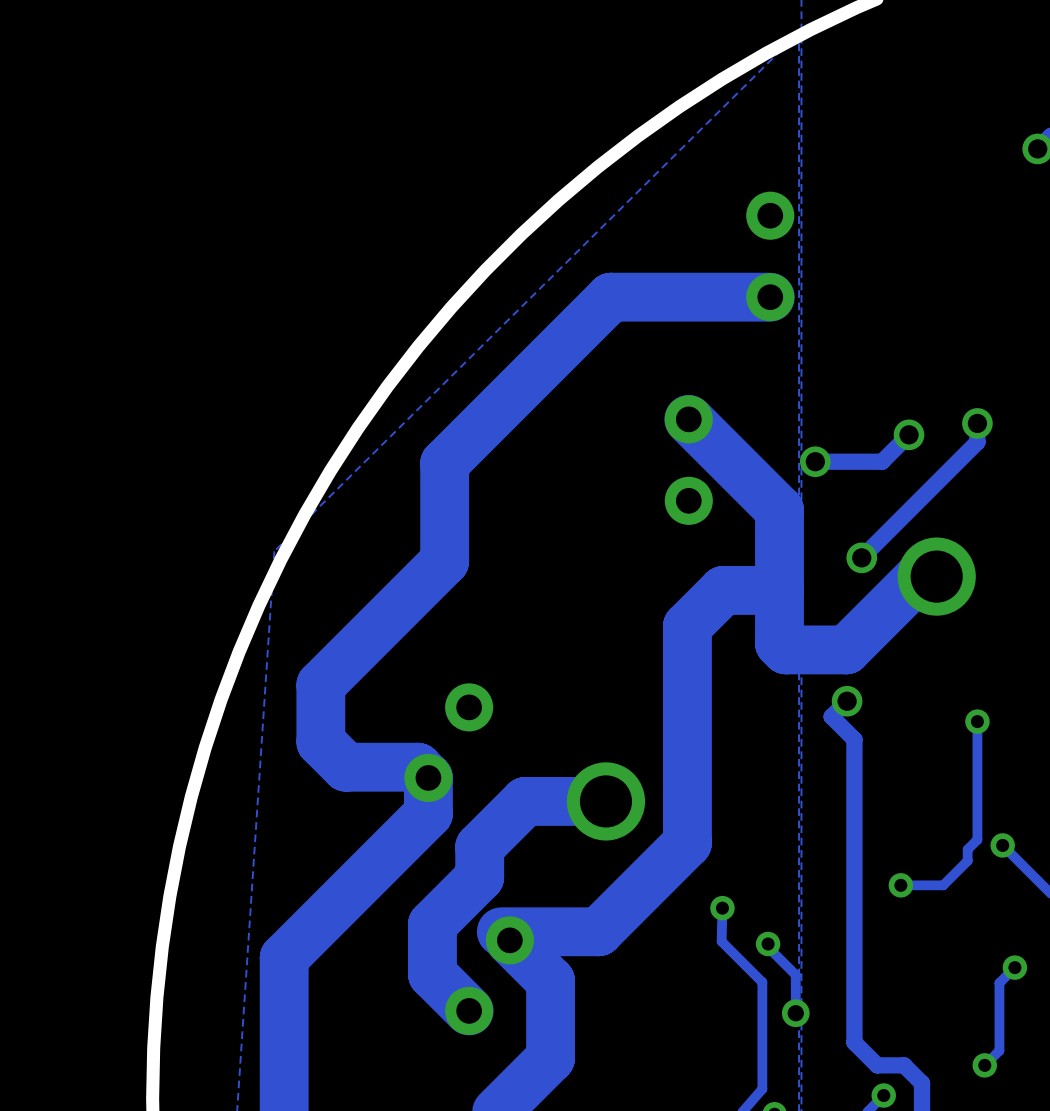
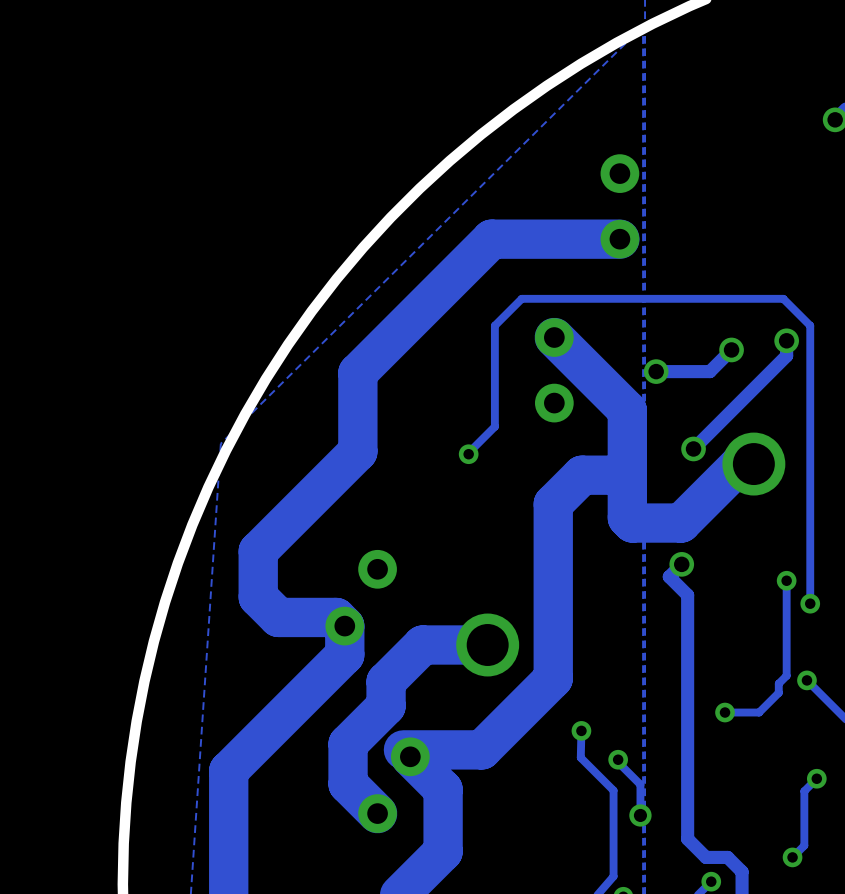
track: none -> (468, 454) (494, 426) (494, 325) (521, 298) (783, 298) (810, 325) (810, 603)
via: none -> (468, 454)
via: none -> (810, 603)

